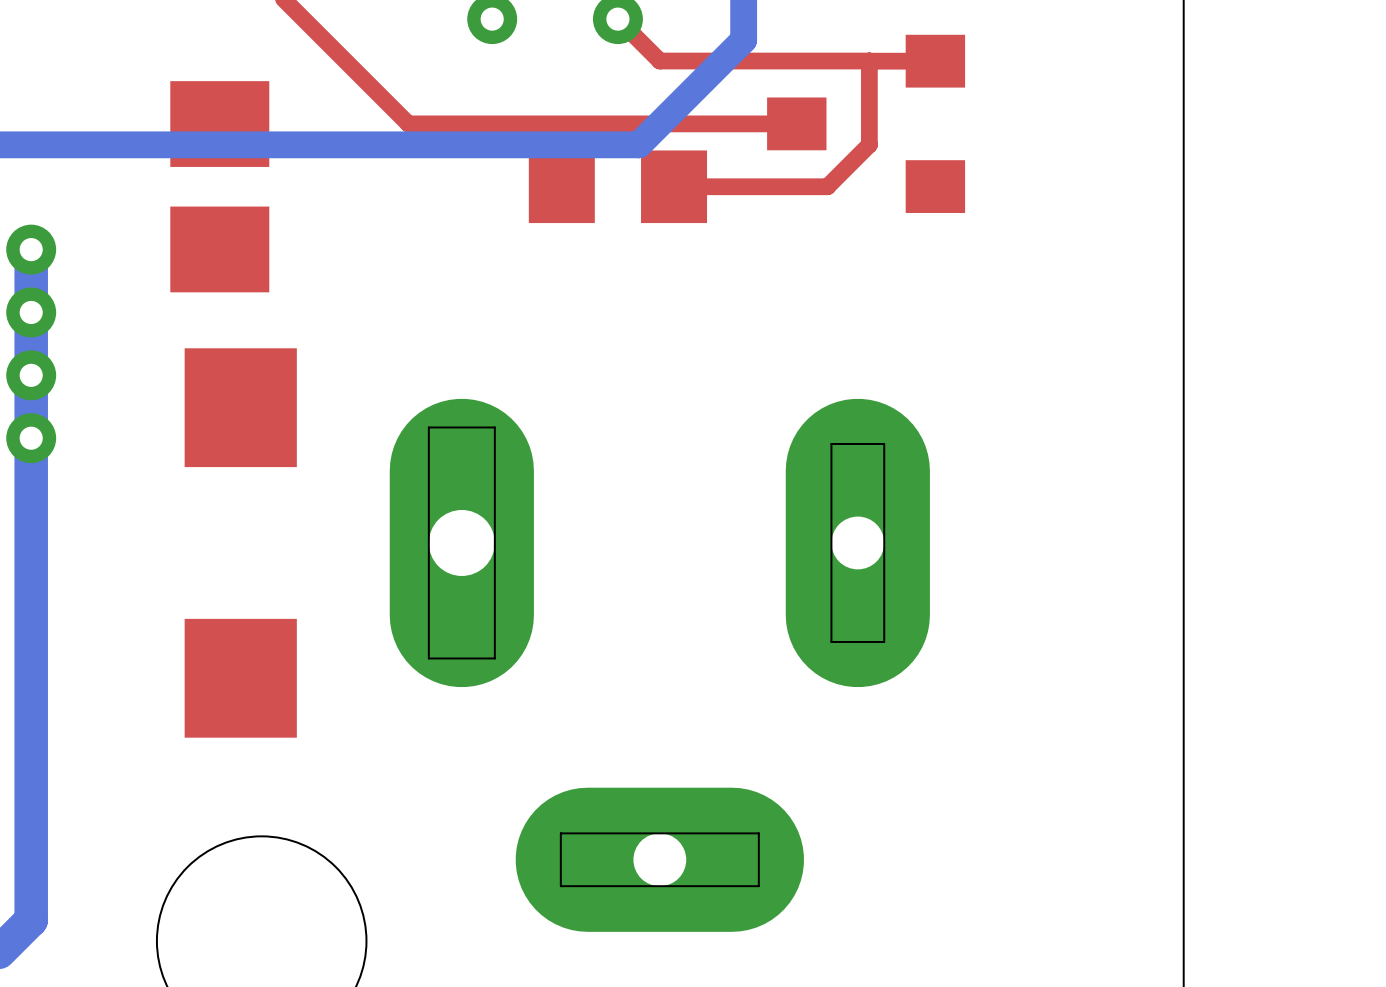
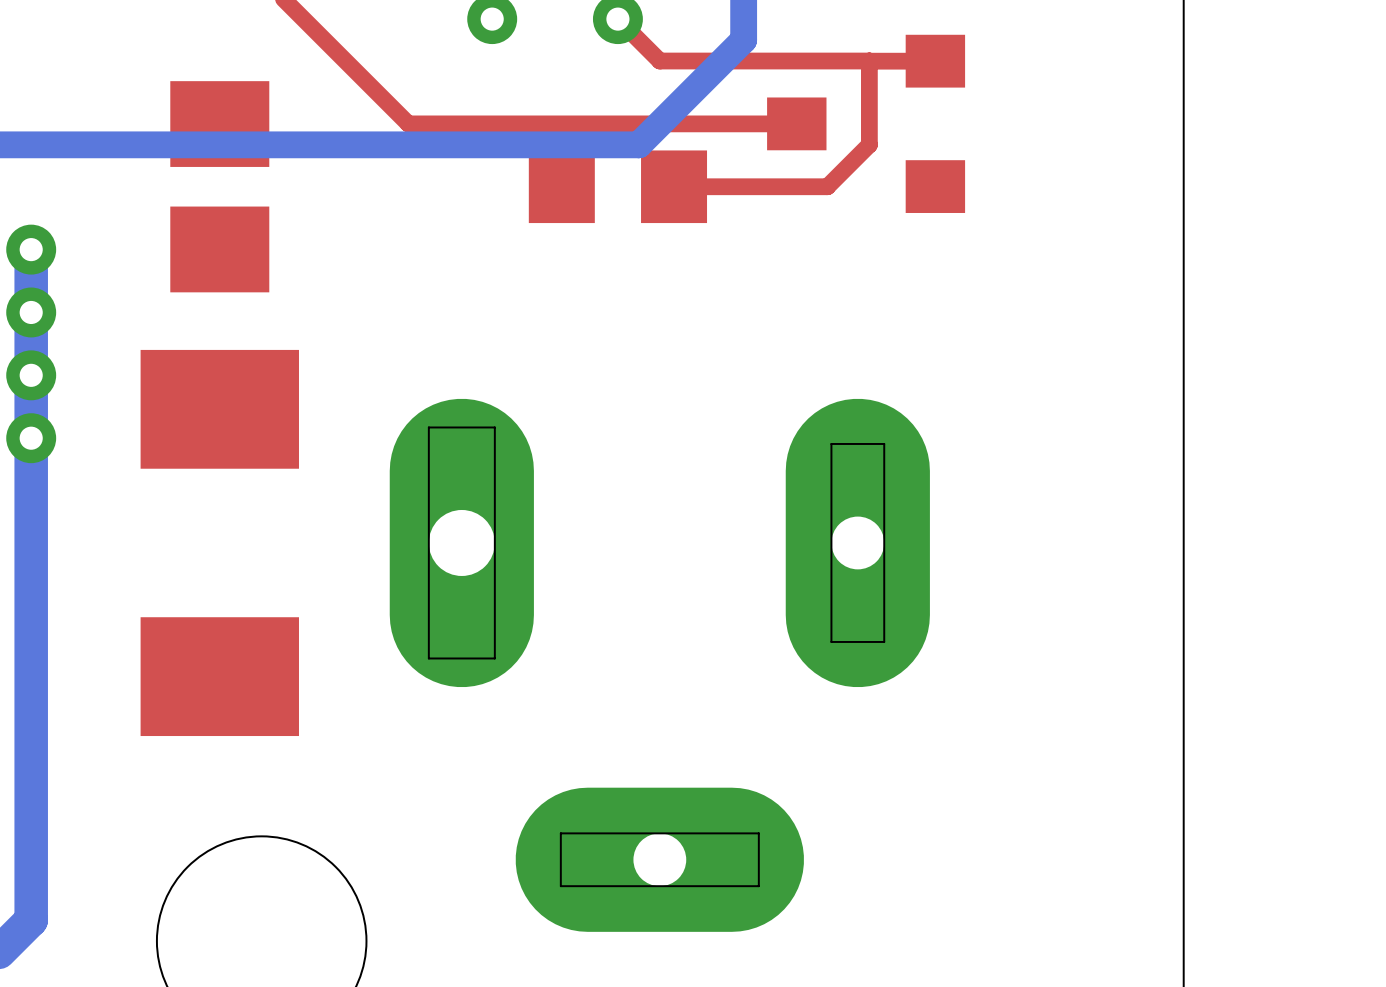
part footprint: [184, 348, 297, 738] -> [140, 349, 299, 737]

